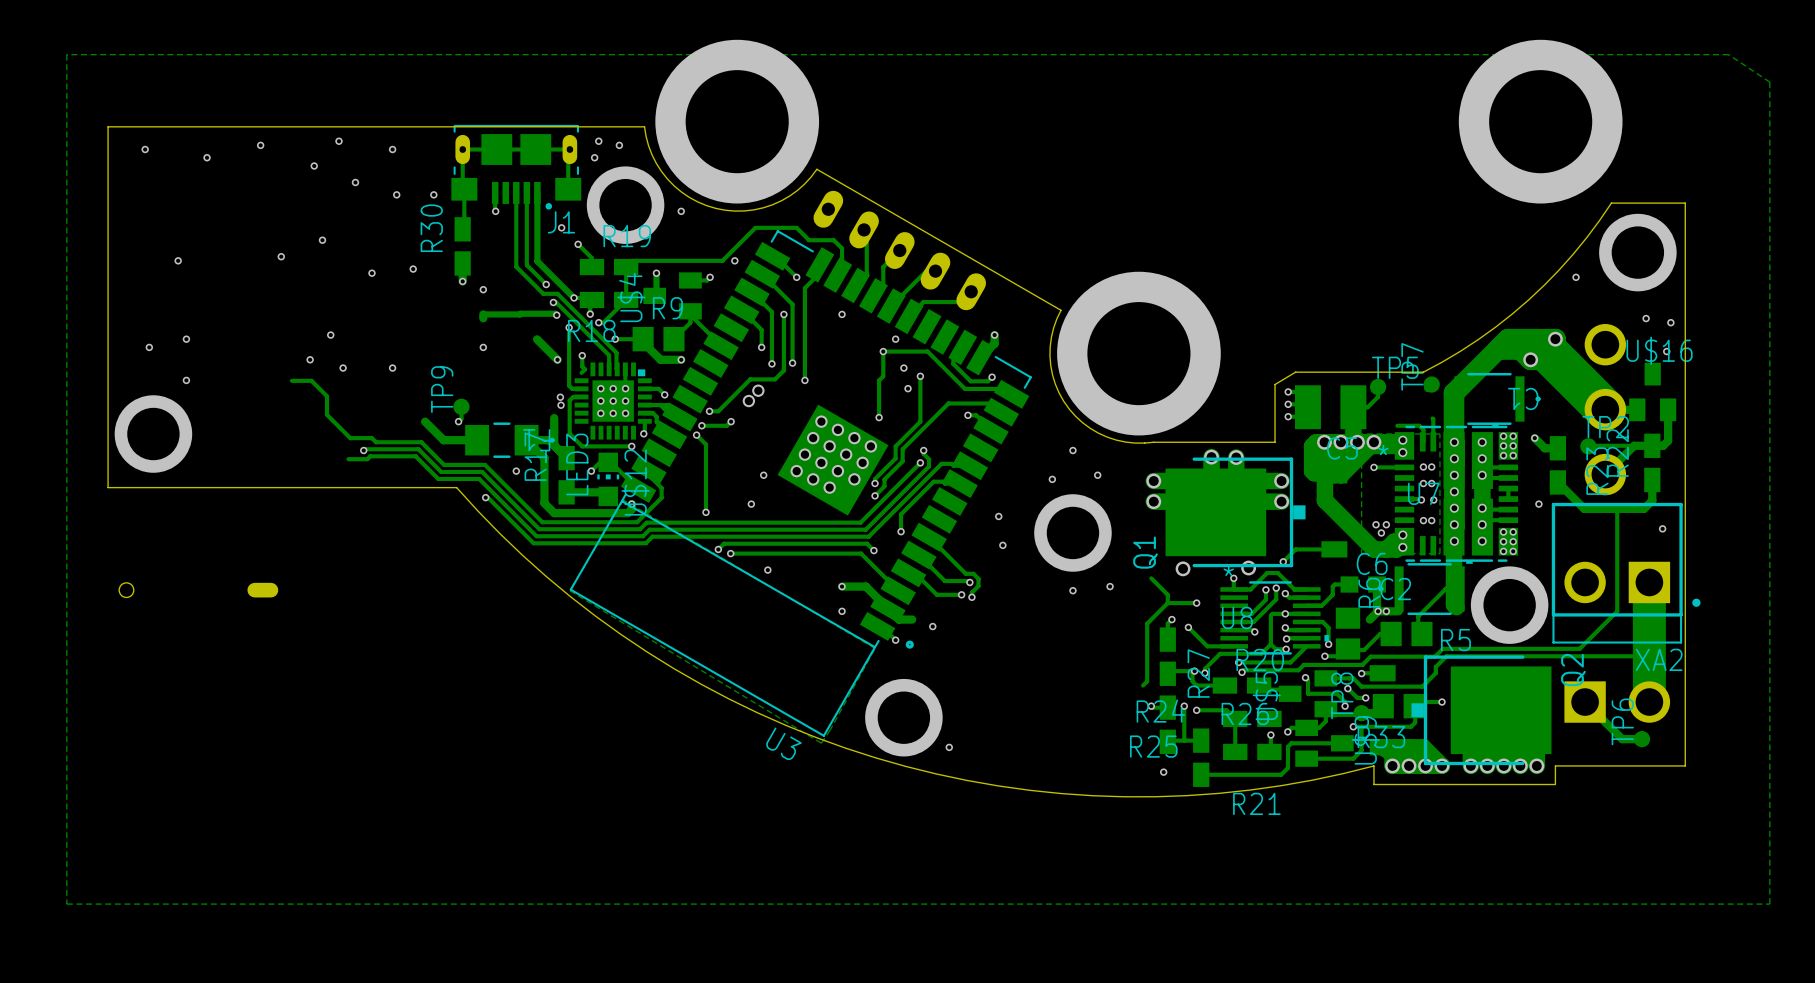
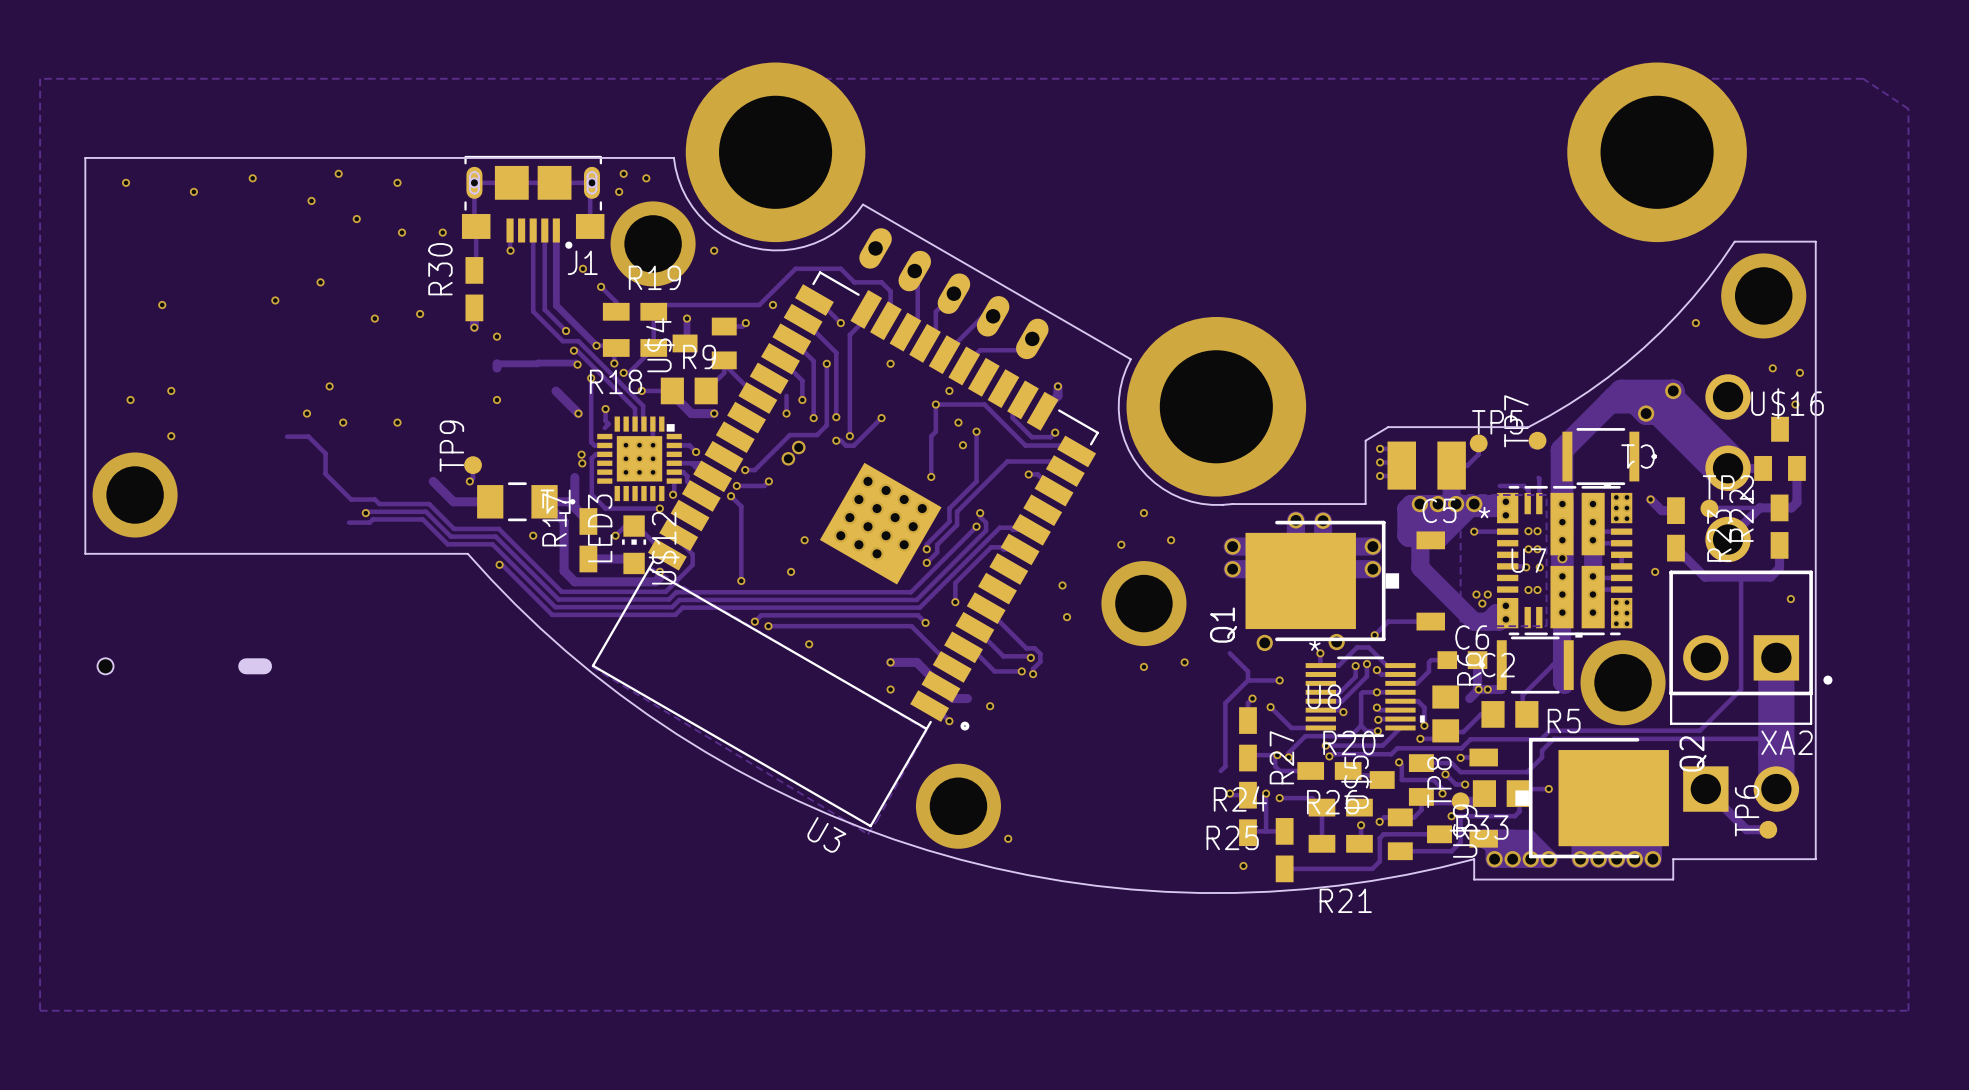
track: none -> (786, 395) (786, 413)
via: none -> (786, 413)
track: none -> (881, 418) (853, 445) (845, 445) (840, 440) (836, 440)
via: none -> (881, 418)
via: none -> (836, 440)

